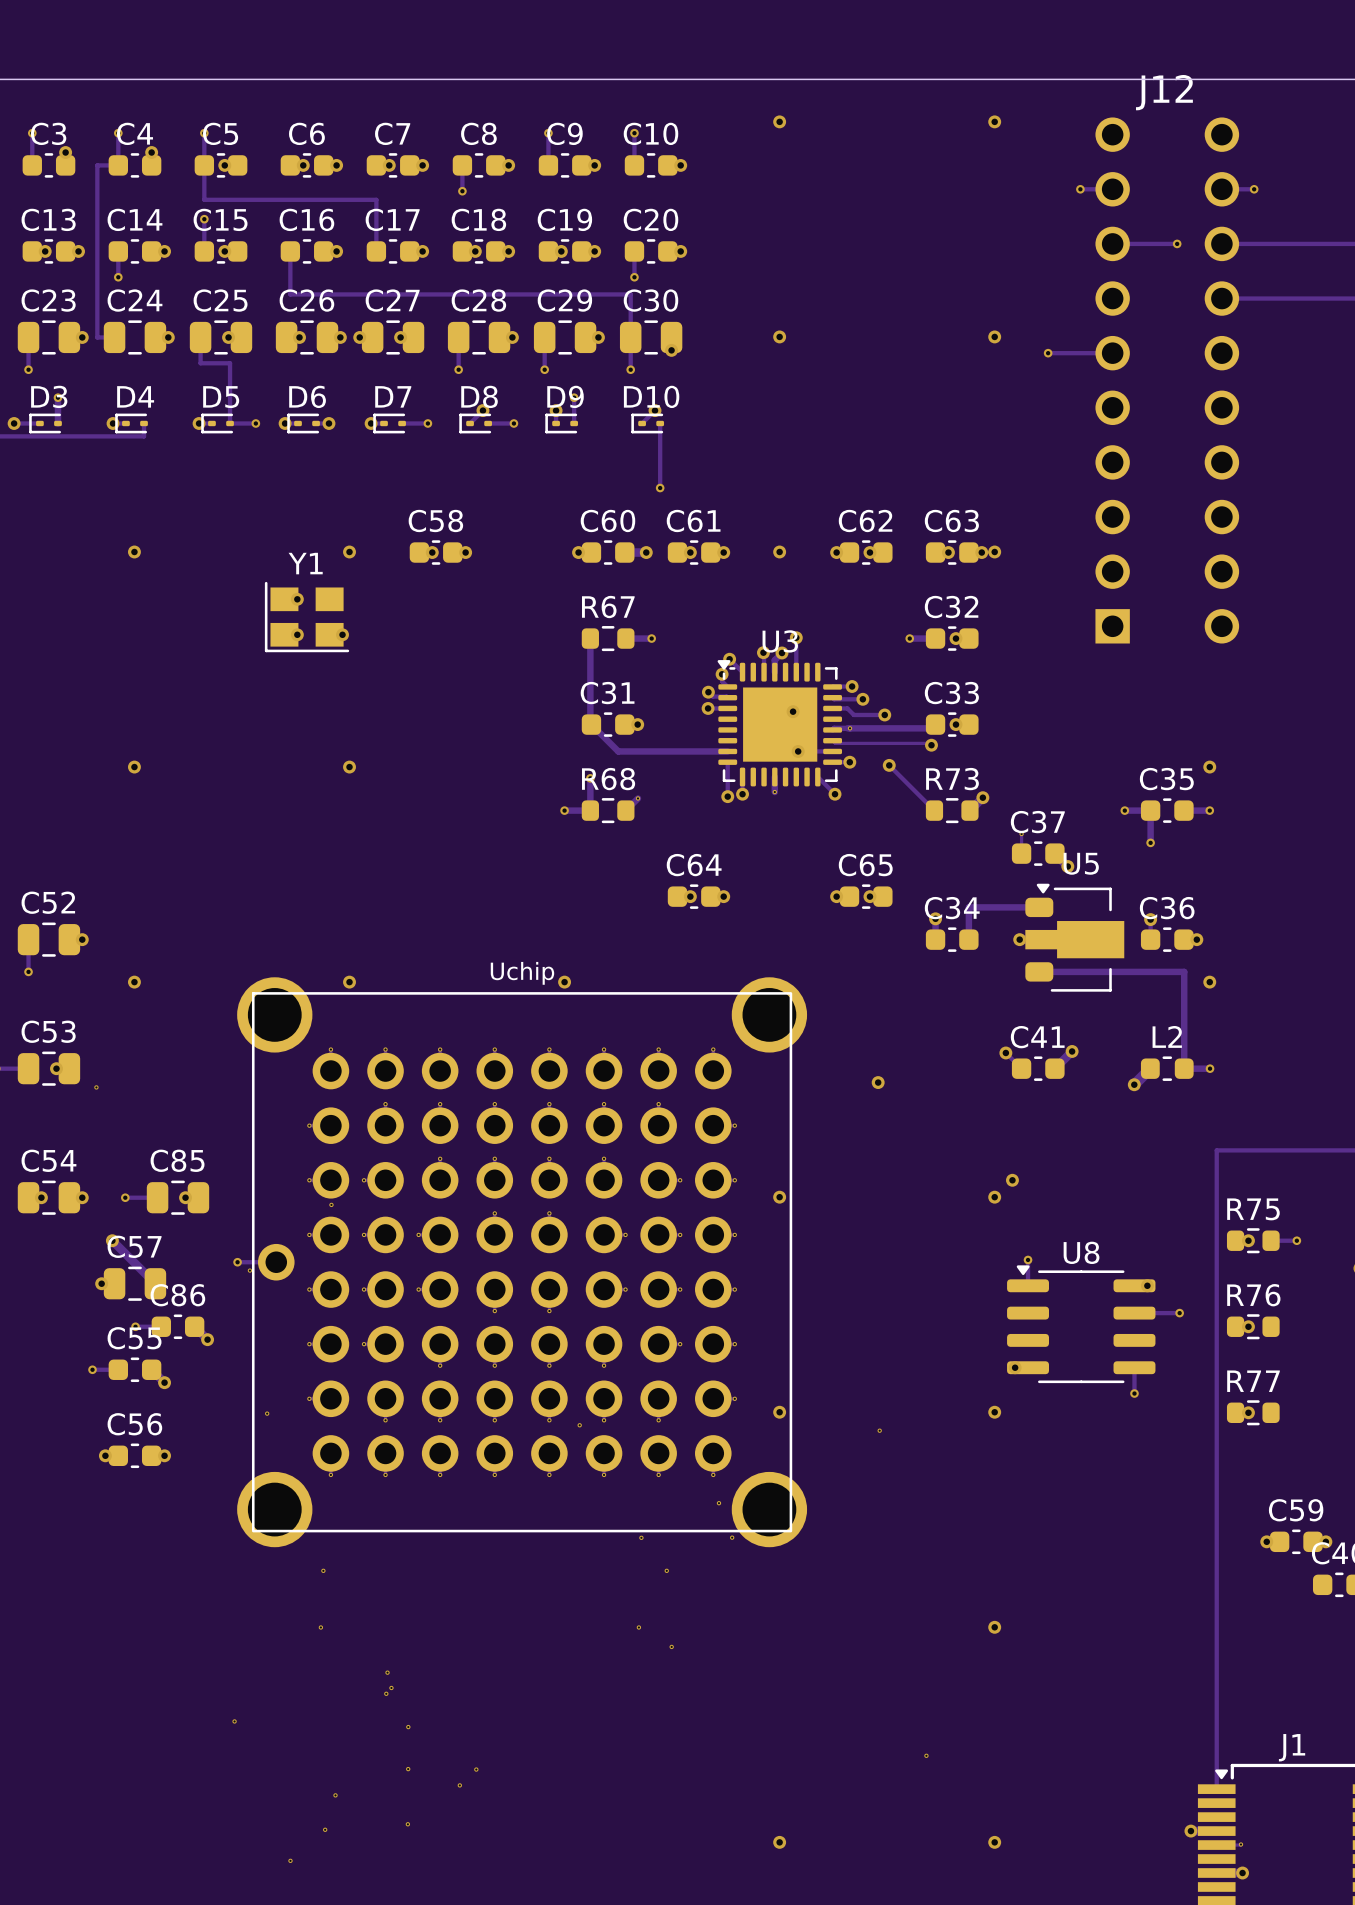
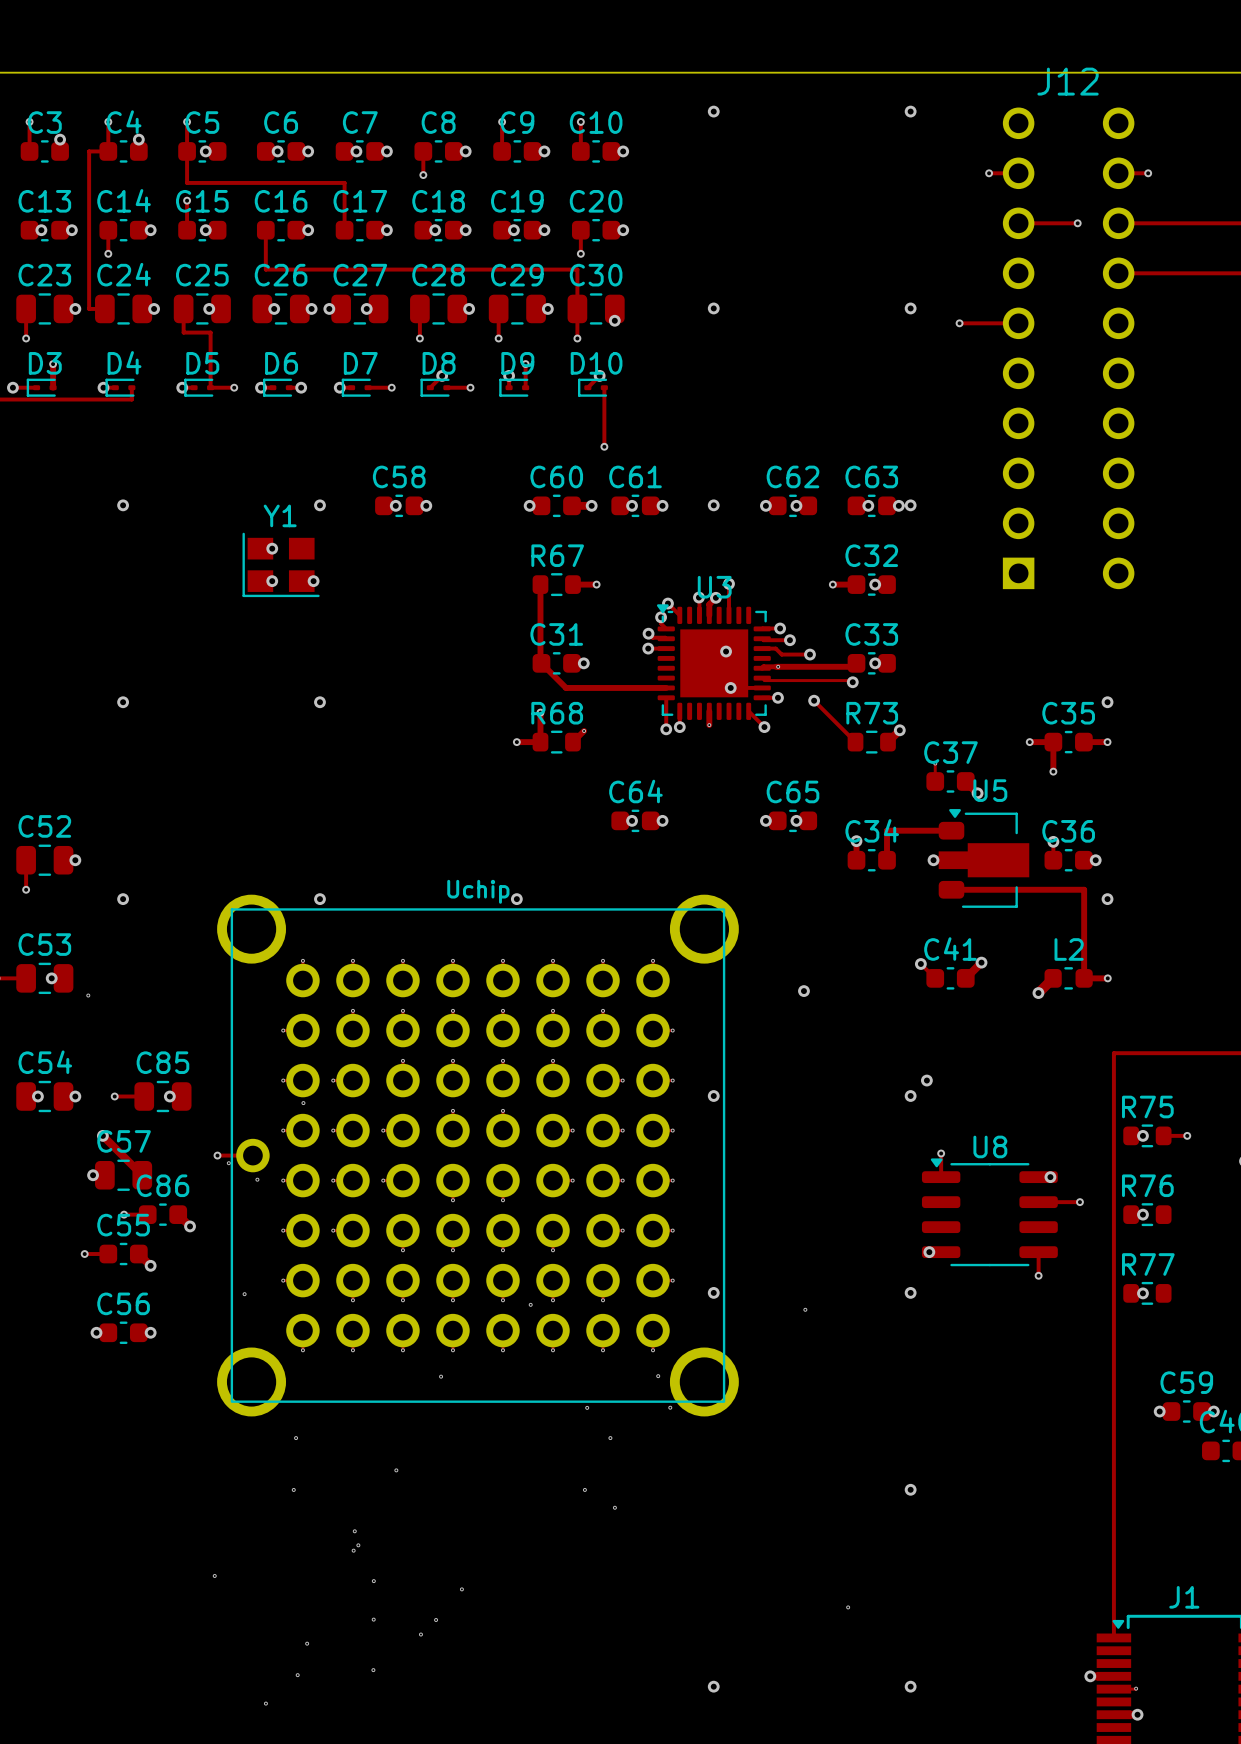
via: none -> (257, 1179)
via: none -> (441, 1376)
via: none -> (396, 1470)
via: none -> (461, 1589)

